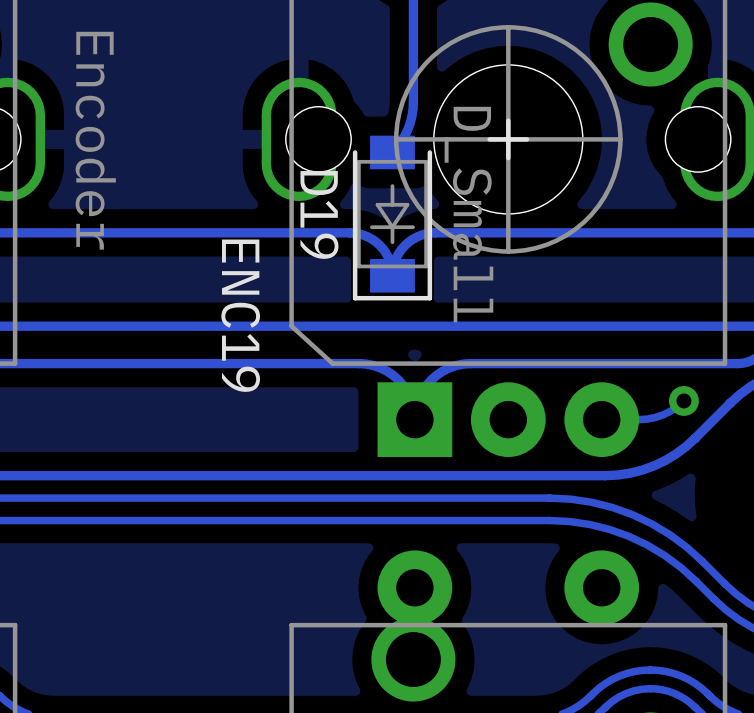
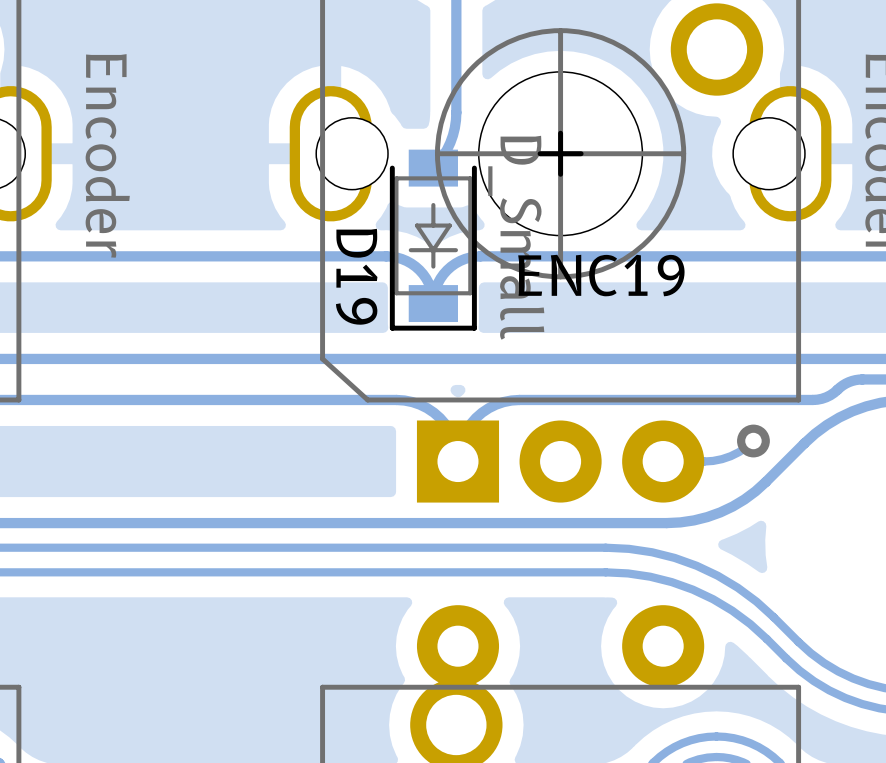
D19 name position: D19 (319, 214) -> D19 (356, 276)
ENC19 name rotation: 0° (240, 315) -> 90° counterclockwise (601, 275)
ENC19 name position: ENC19 (240, 315) -> ENC19 (601, 275)

